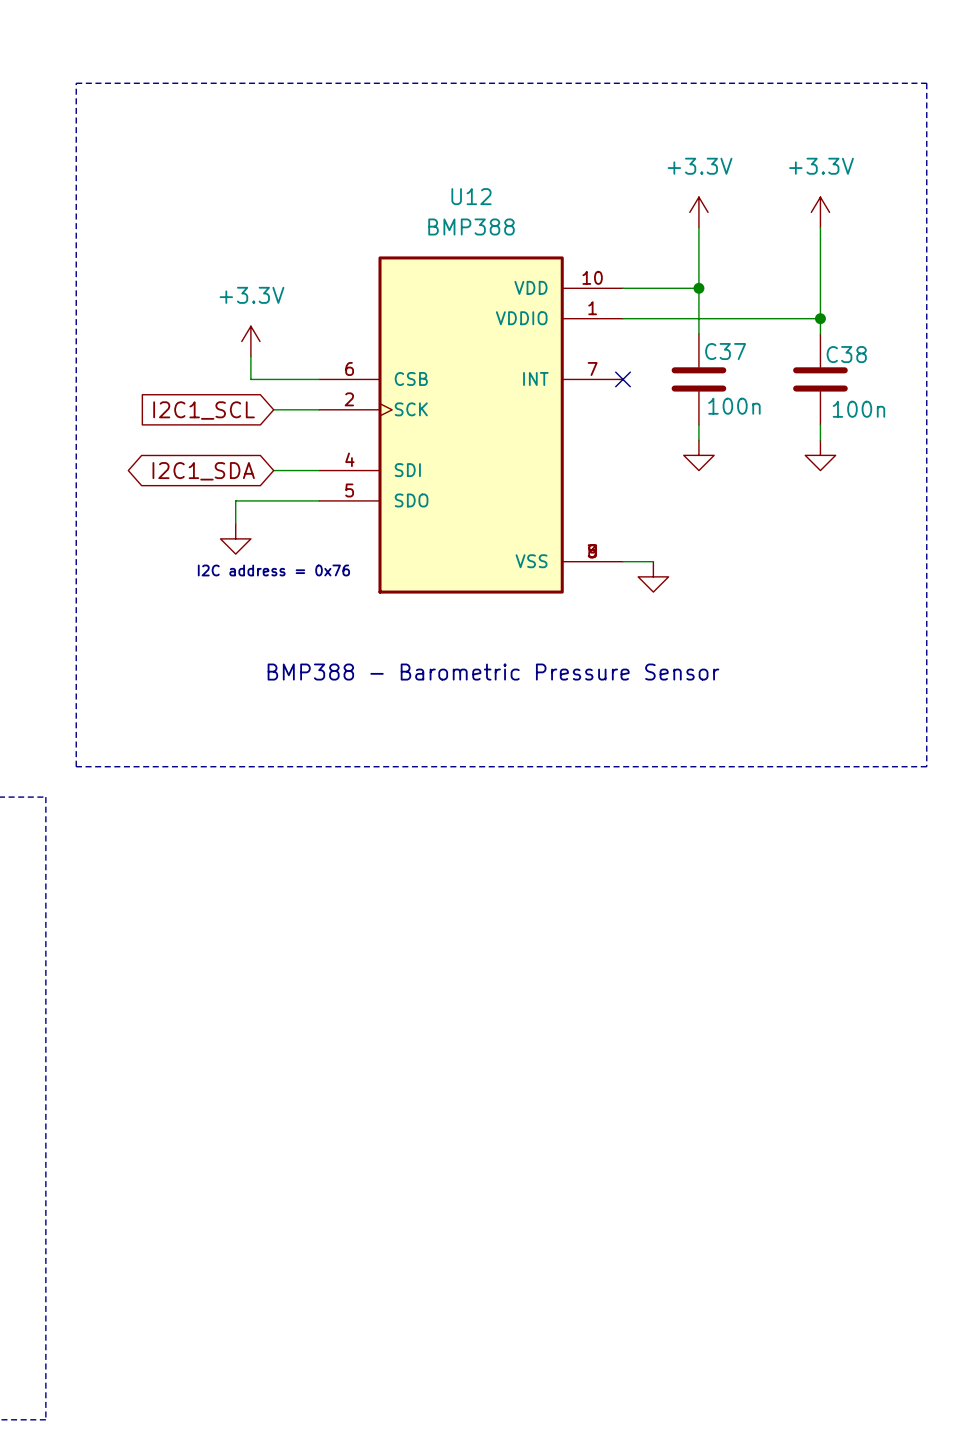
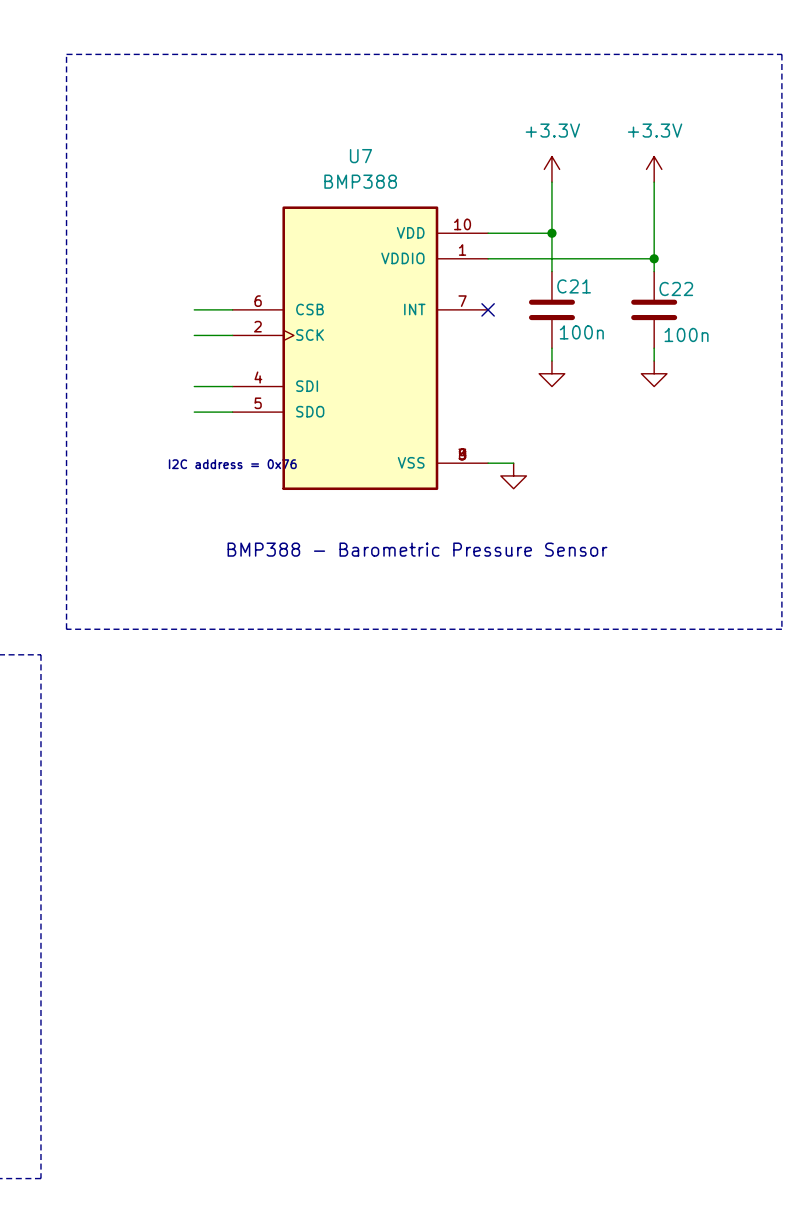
power symbol: +3.3V (698, 212) -> none
power symbol: +3.3V (820, 212) -> none
power symbol: none -> +3.3V (551, 169)
power symbol: none -> +3.3V (654, 169)
wire: (698, 227) (698, 333) -> (551, 182) (551, 271)
wire: (820, 227) (820, 333) -> (654, 182) (654, 271)
wire: (623, 288) (698, 288) -> (488, 233) (551, 233)
junction: (698, 288) -> none
junction: none -> (551, 233)
wire: (623, 318) (820, 318) -> (488, 258) (654, 258)
junction: (820, 318) -> none
junction: none -> (654, 258)
power symbol: +3.3V (250, 341) -> none
wire: (250, 356) (250, 379) (319, 379) -> none
no-connect mark position: (623, 379) -> (488, 309)
C37: 100n (698, 379) -> none
C38: 100n (820, 379) -> none
wire: none -> (194, 309) (232, 309)
C21: none -> 100n (551, 309)
C22: none -> 100n (654, 309)
wire: (273, 409) (319, 409) -> (194, 335) (232, 335)
global label: I2C1_SCL (204, 410) -> none
U12: BMP388 (471, 425) -> none
wire: (698, 425) (698, 440) -> (551, 348) (551, 360)
wire: (820, 425) (820, 440) -> (654, 348) (654, 360)
U7: none -> BMP388 (360, 348)
power symbol: (698, 455) -> none
power symbol: (820, 455) -> none
power symbol: none -> (551, 373)
power symbol: none -> (654, 373)
wire: (273, 470) (319, 470) -> (194, 386) (232, 386)
global label: I2C1_SDA (203, 471) -> none
wire: (319, 500) (235, 500) (235, 523) -> none
wire: none -> (194, 412) (232, 412)
power symbol: (235, 538) -> none
wire: (623, 561) (653, 561) -> (488, 463) (513, 463)
power symbol position: (653, 576) -> (513, 475)

